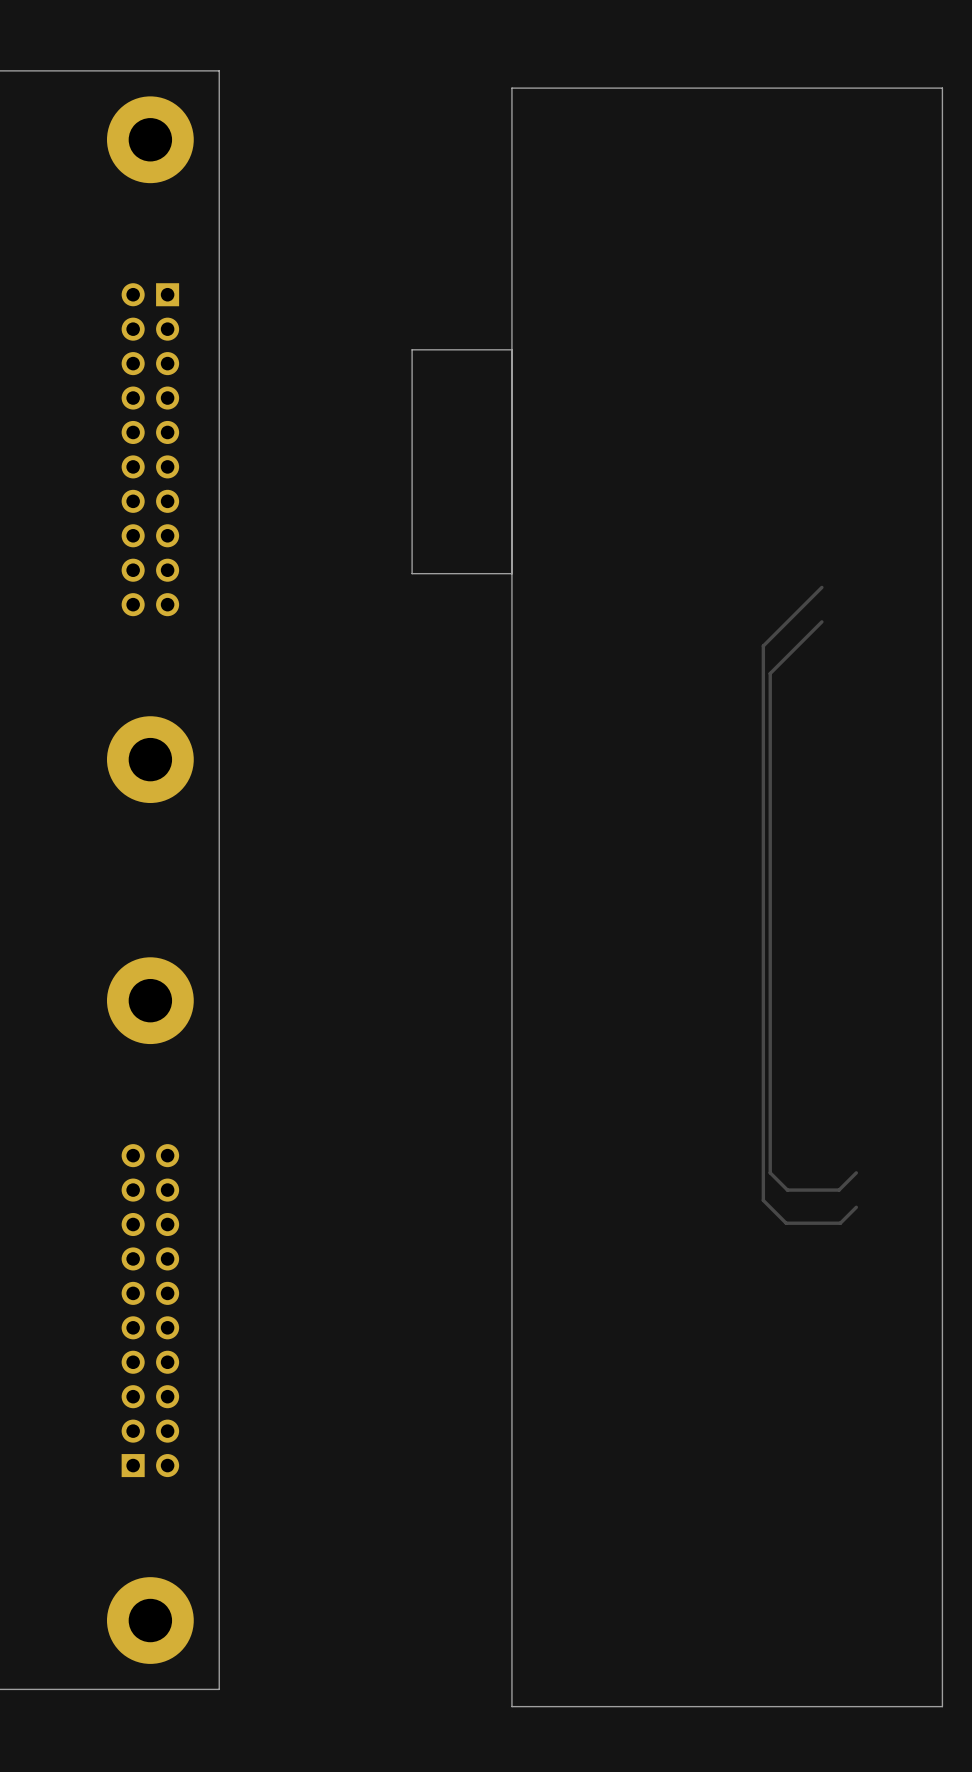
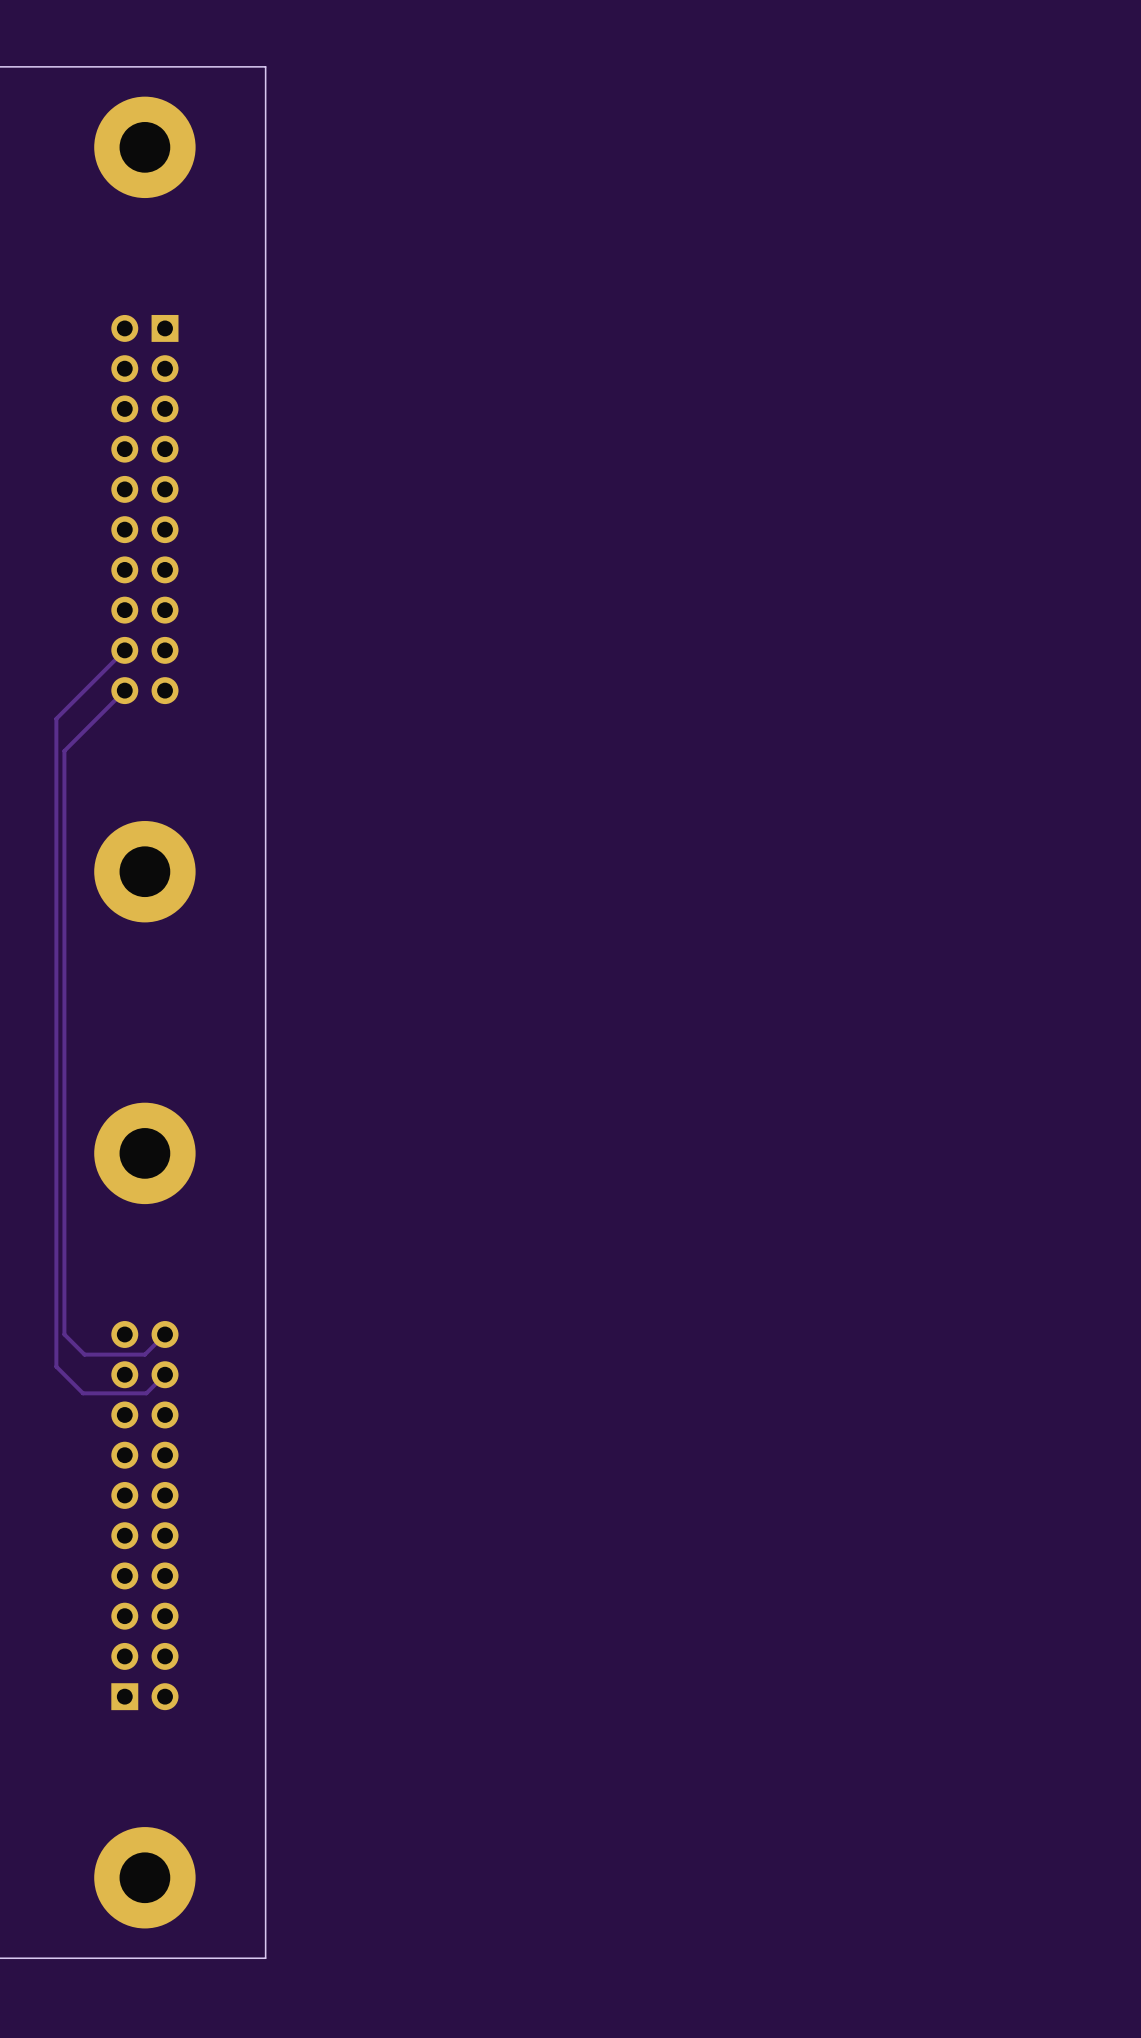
board edge: (219, 70) (219, 1689) -> (225, 66) (265, 66) (265, 1958) (225, 1958)
board edge: (942, 88) (511, 88) (511, 1706) (942, 1706) (942, 88) -> none
board edge: (511, 349) (412, 349) (412, 573) (511, 573) -> none
track: none -> (124, 650) (56, 718) (56, 1366) (83, 1393) (146, 1393) (165, 1374)
track: (821, 587) (763, 645) (763, 1200) (786, 1223) (840, 1223) (856, 1207) -> none
track: none -> (124, 690) (64, 750) (64, 1334) (84, 1354) (144, 1354) (165, 1334)
track: (821, 621) (770, 673) (770, 1172) (787, 1190) (839, 1190) (856, 1172) -> none

